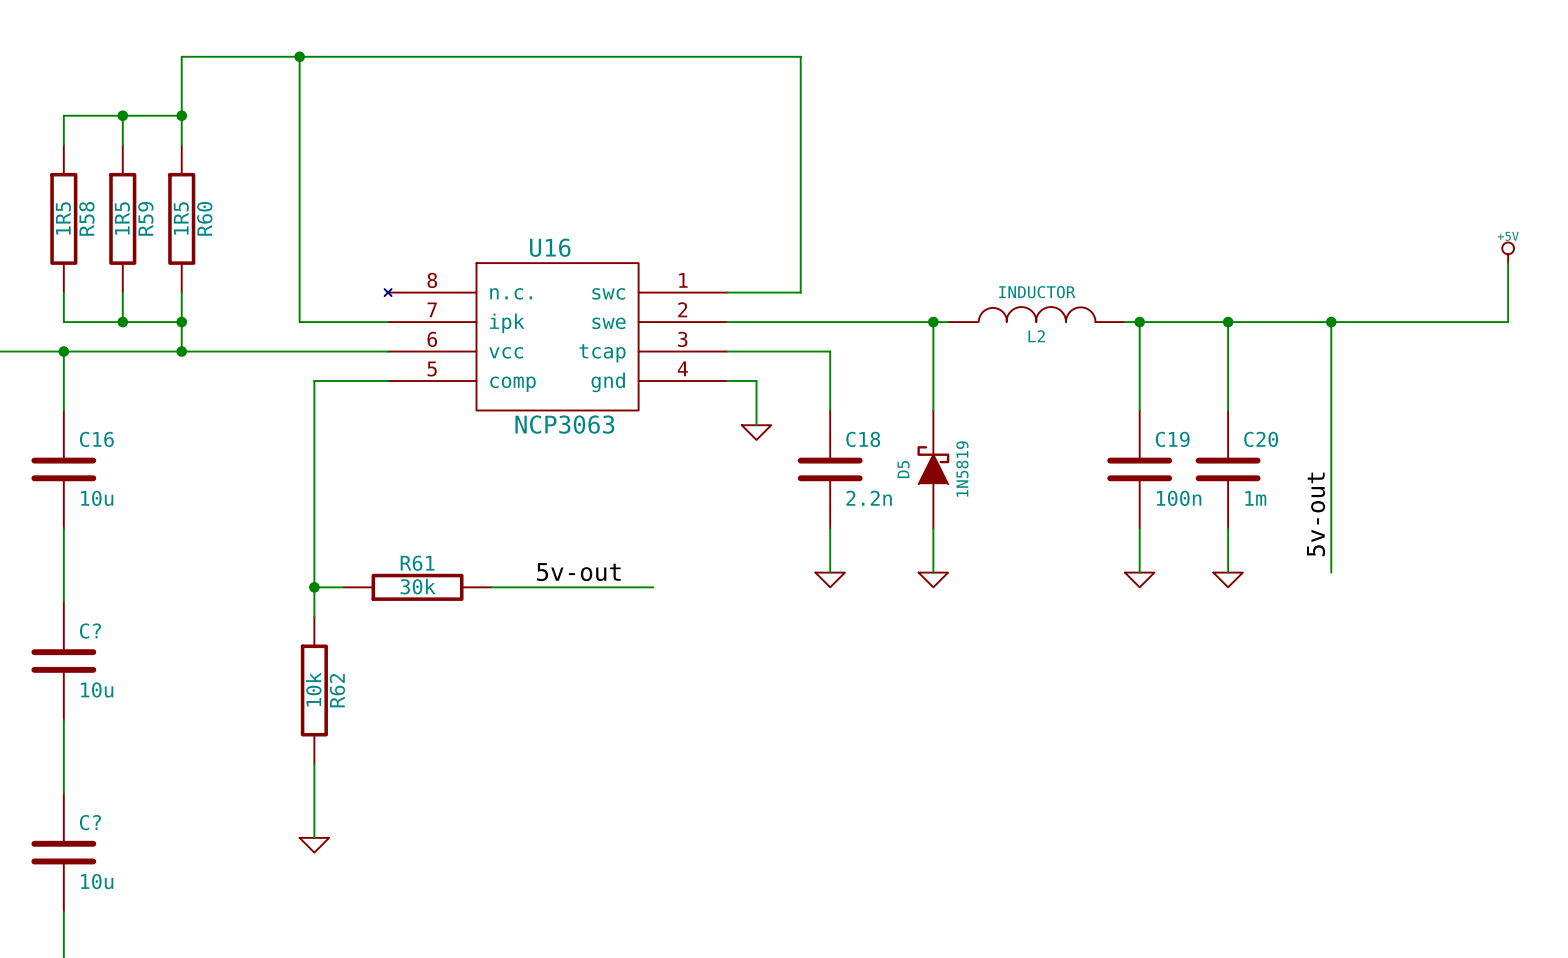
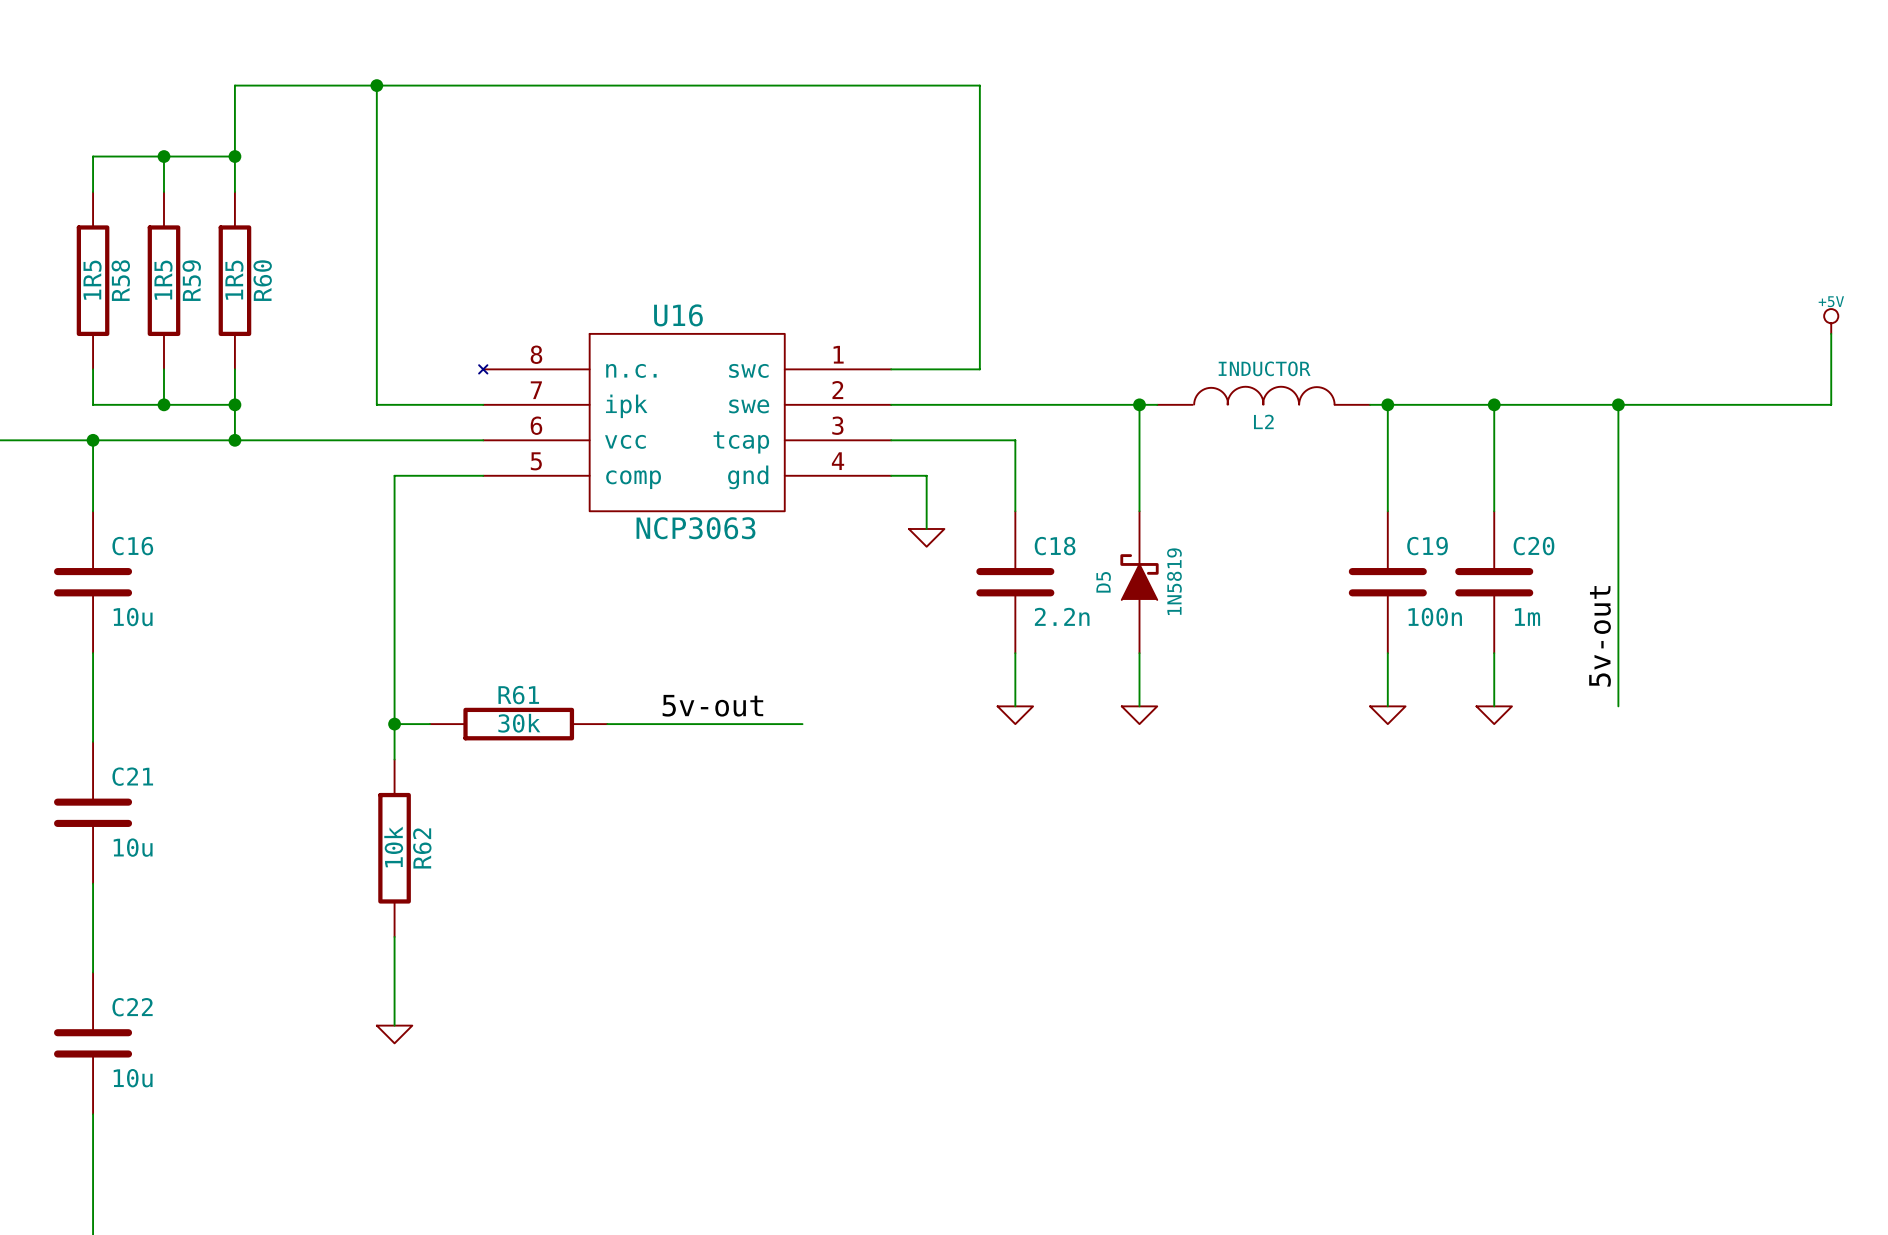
C? name: C? (90, 631) -> C21 (132, 776)
C? name: C? (90, 822) -> C22 (132, 1007)

